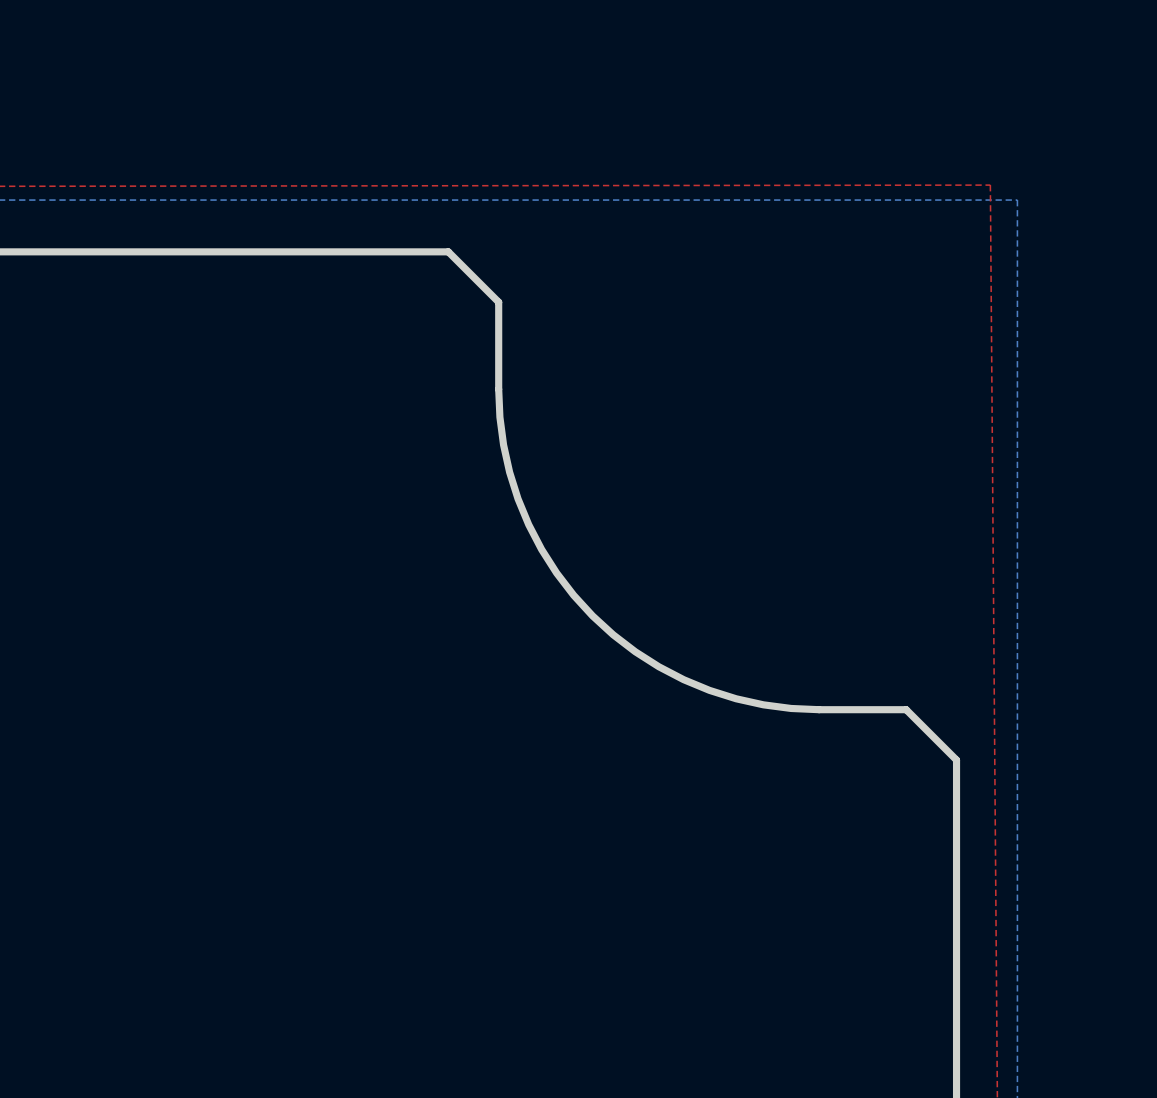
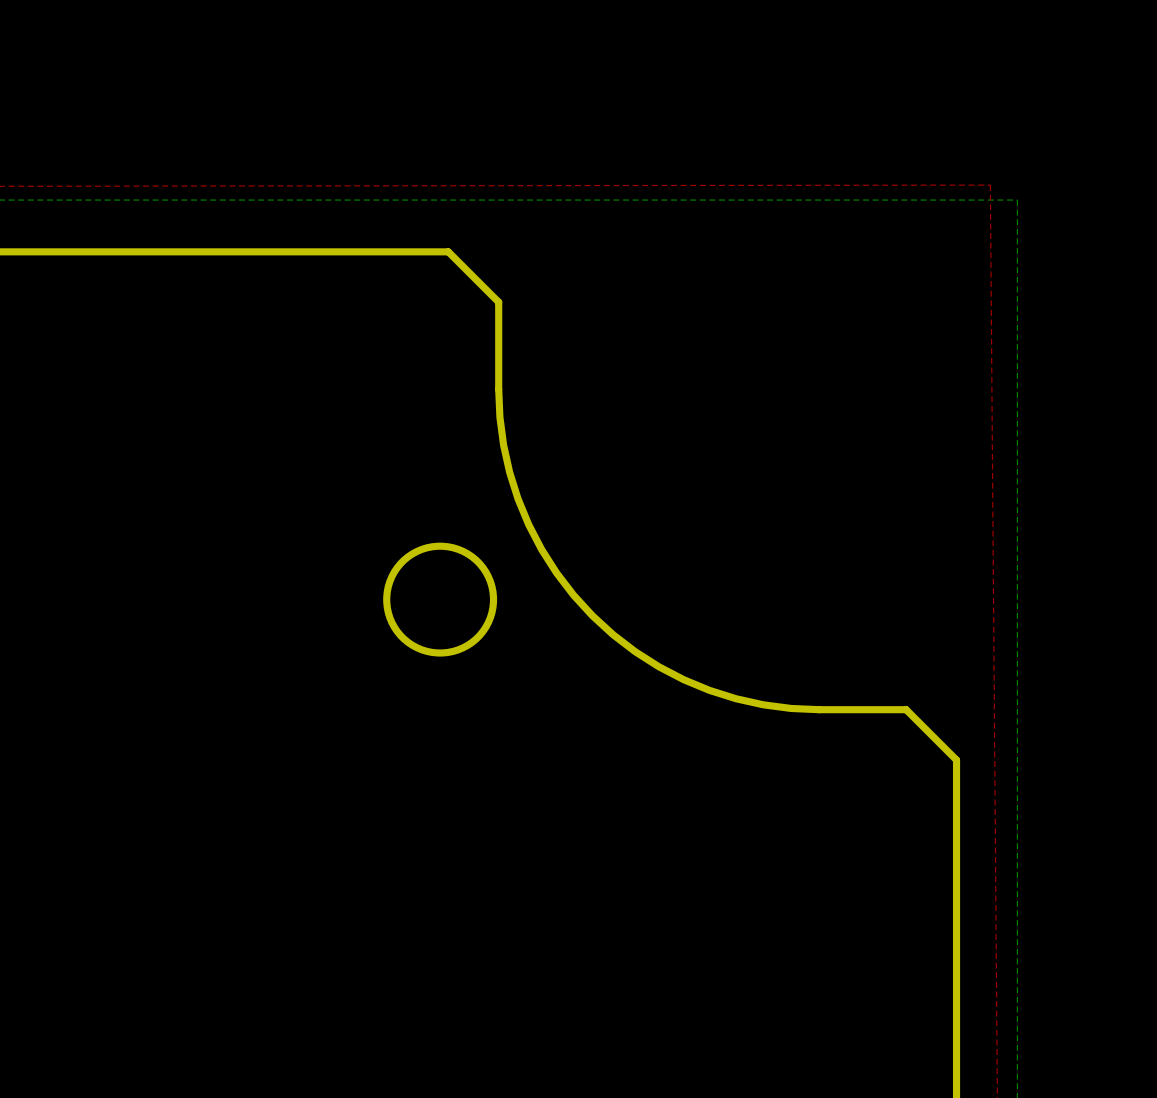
round board edge: none -> [383, 542, 498, 657]

